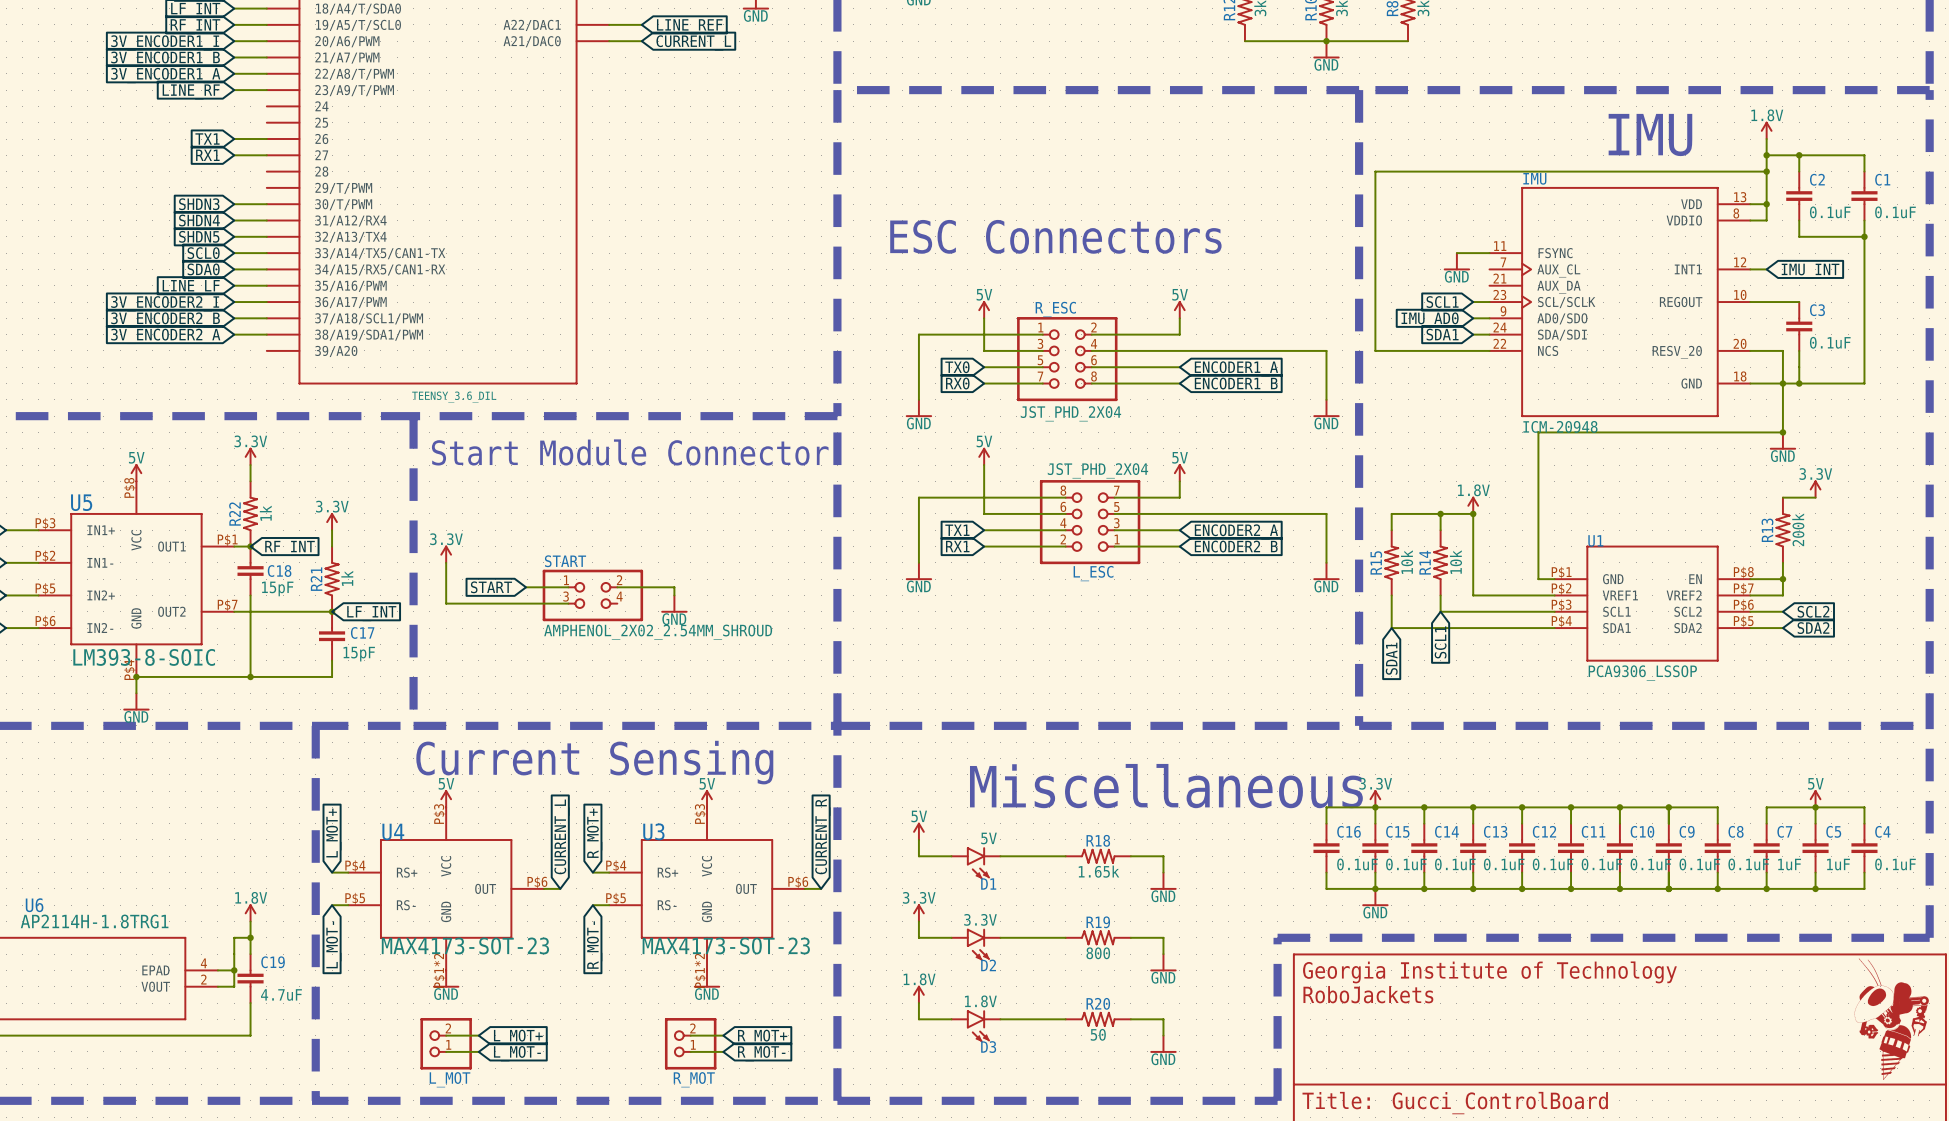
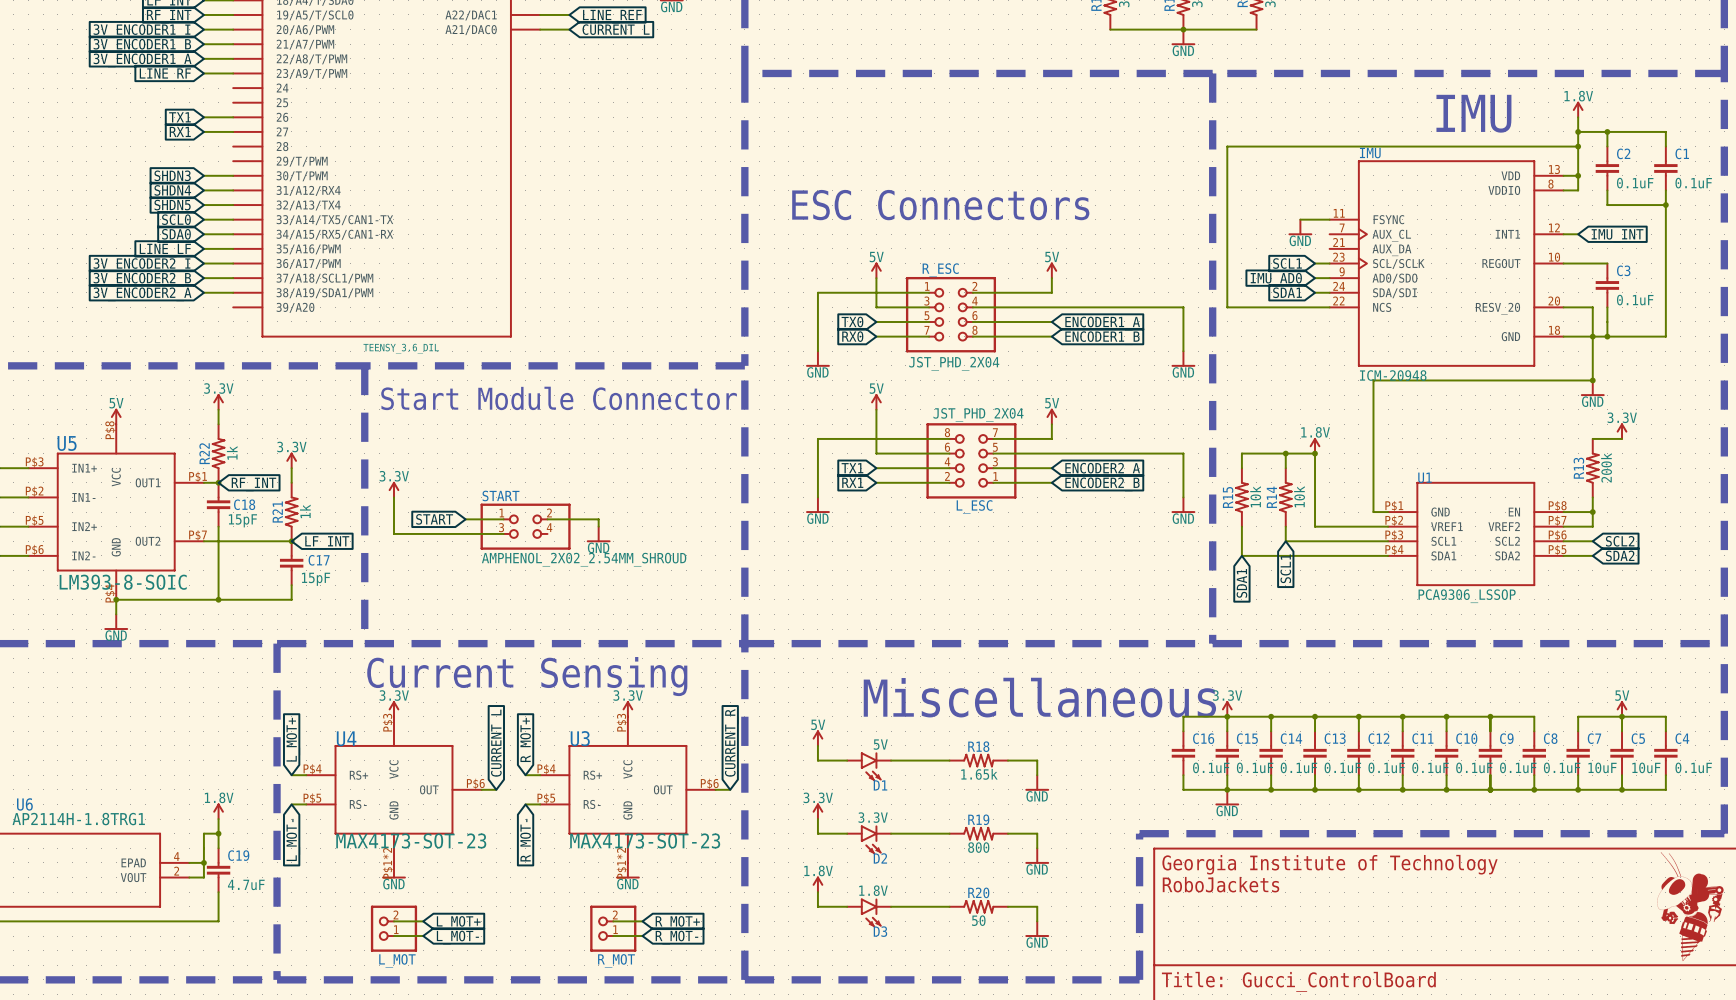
power symbol: 5V (446, 798) -> 3.3V (393, 709)
power symbol: 5V (707, 798) -> 3.3V (627, 709)
C7 value: 1uF (1789, 864) -> 10uF (1602, 767)
C5 value: 1uF (1838, 864) -> 10uF (1646, 767)

